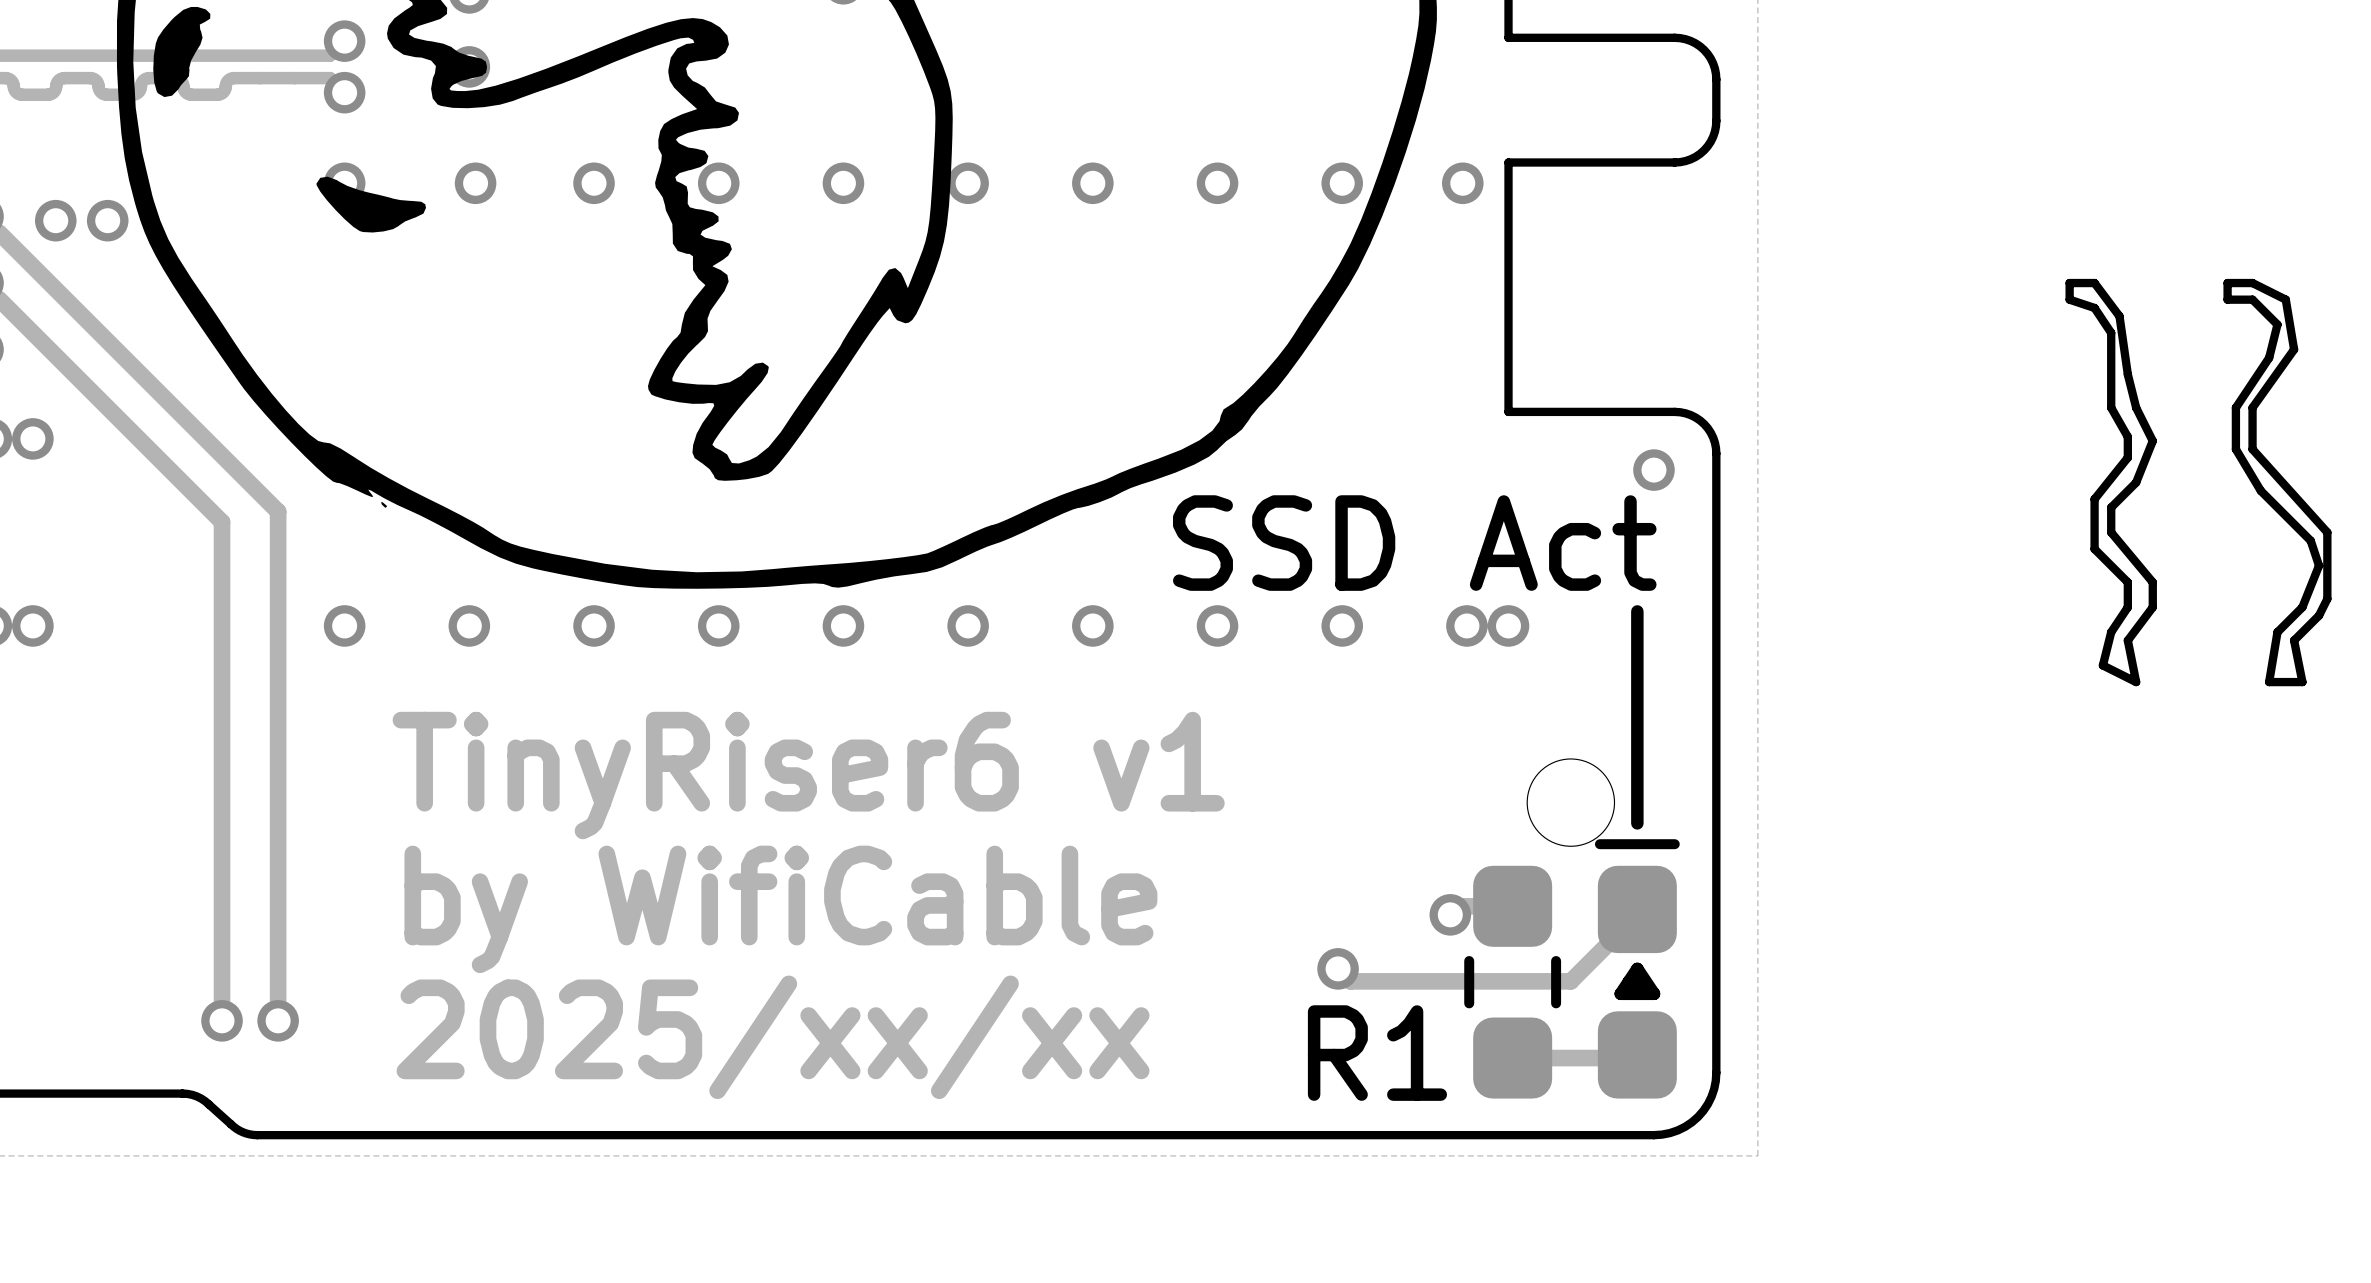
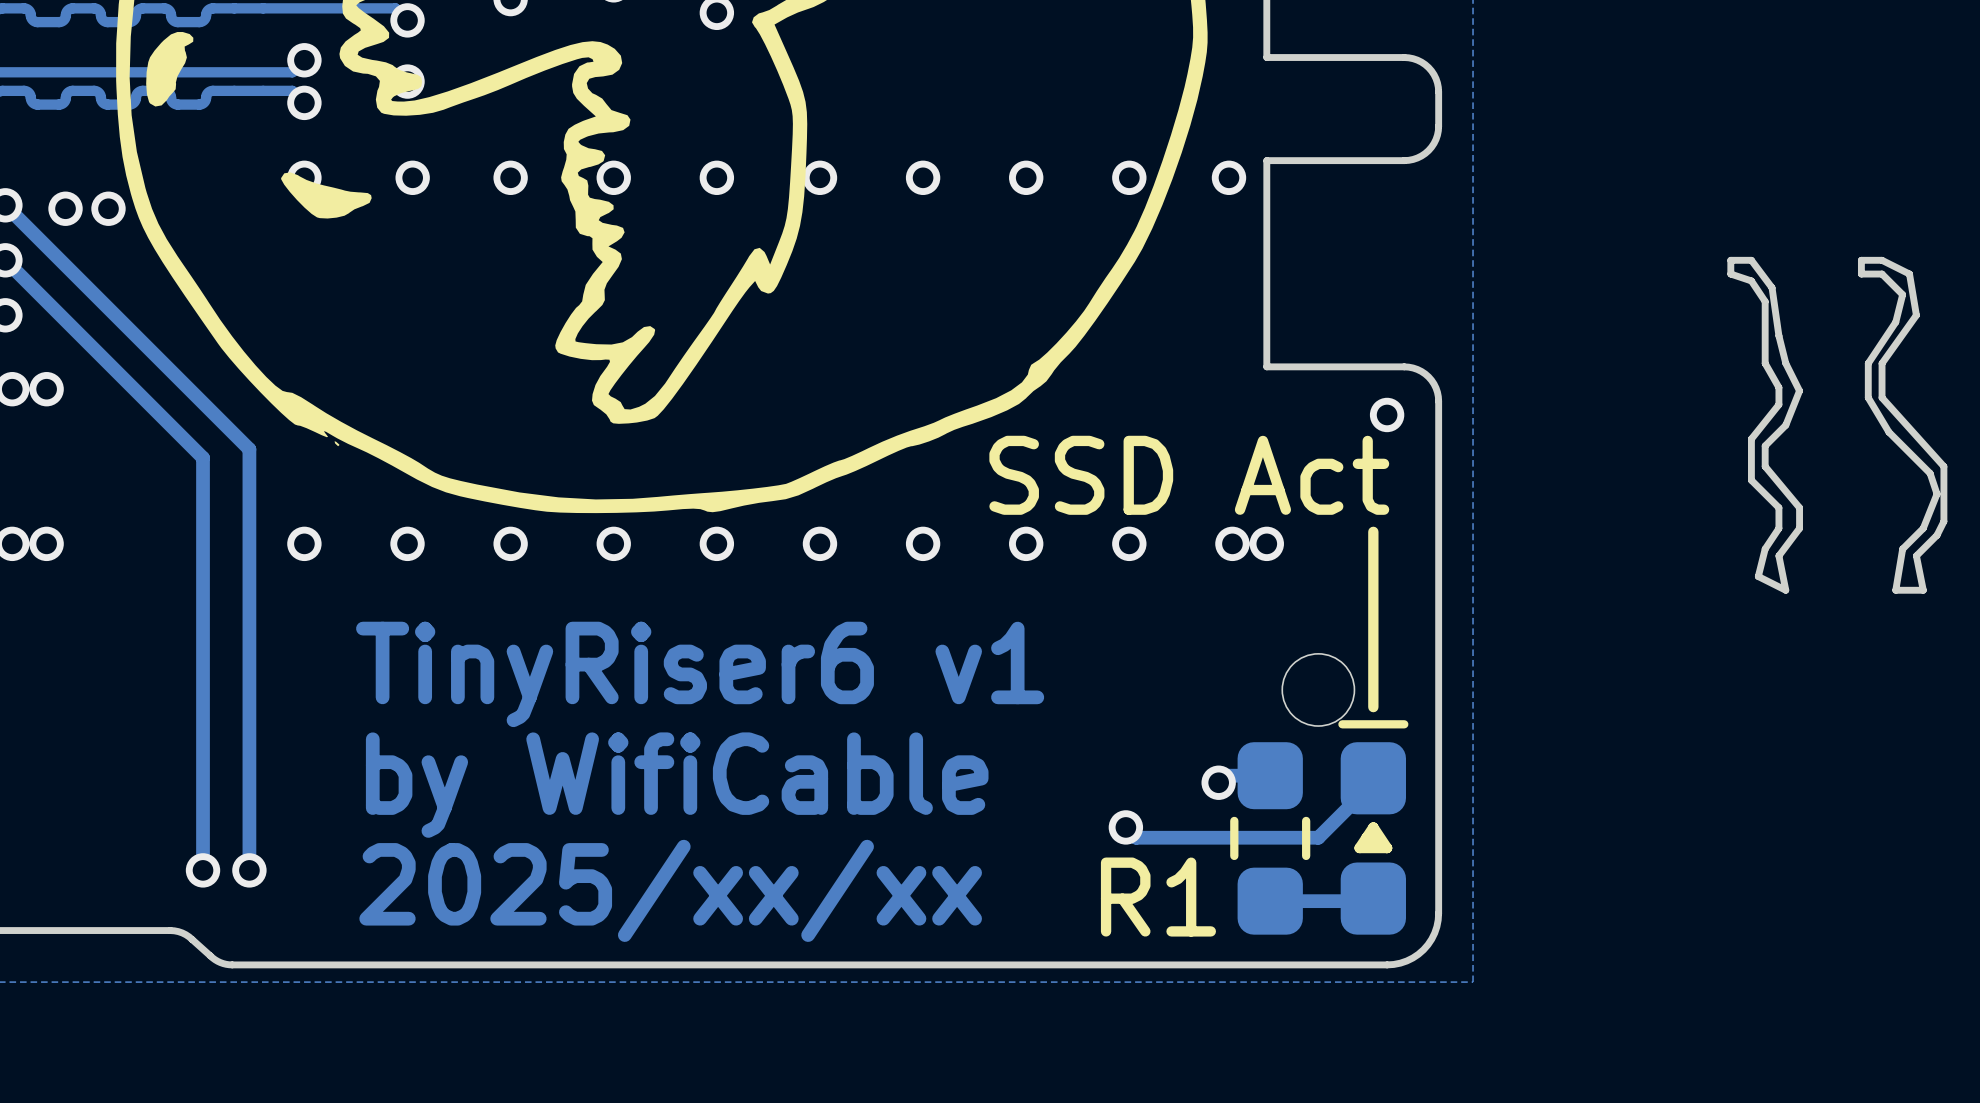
text position: TinyRiser6 v1 (808, 775) -> TinyRiser6 v1 (700, 674)
text position: by WifiCable (780, 909) -> by WifiCable (677, 785)
text position: 2025/xx/xx (773, 1037) -> 2025/xx/xx (670, 890)

